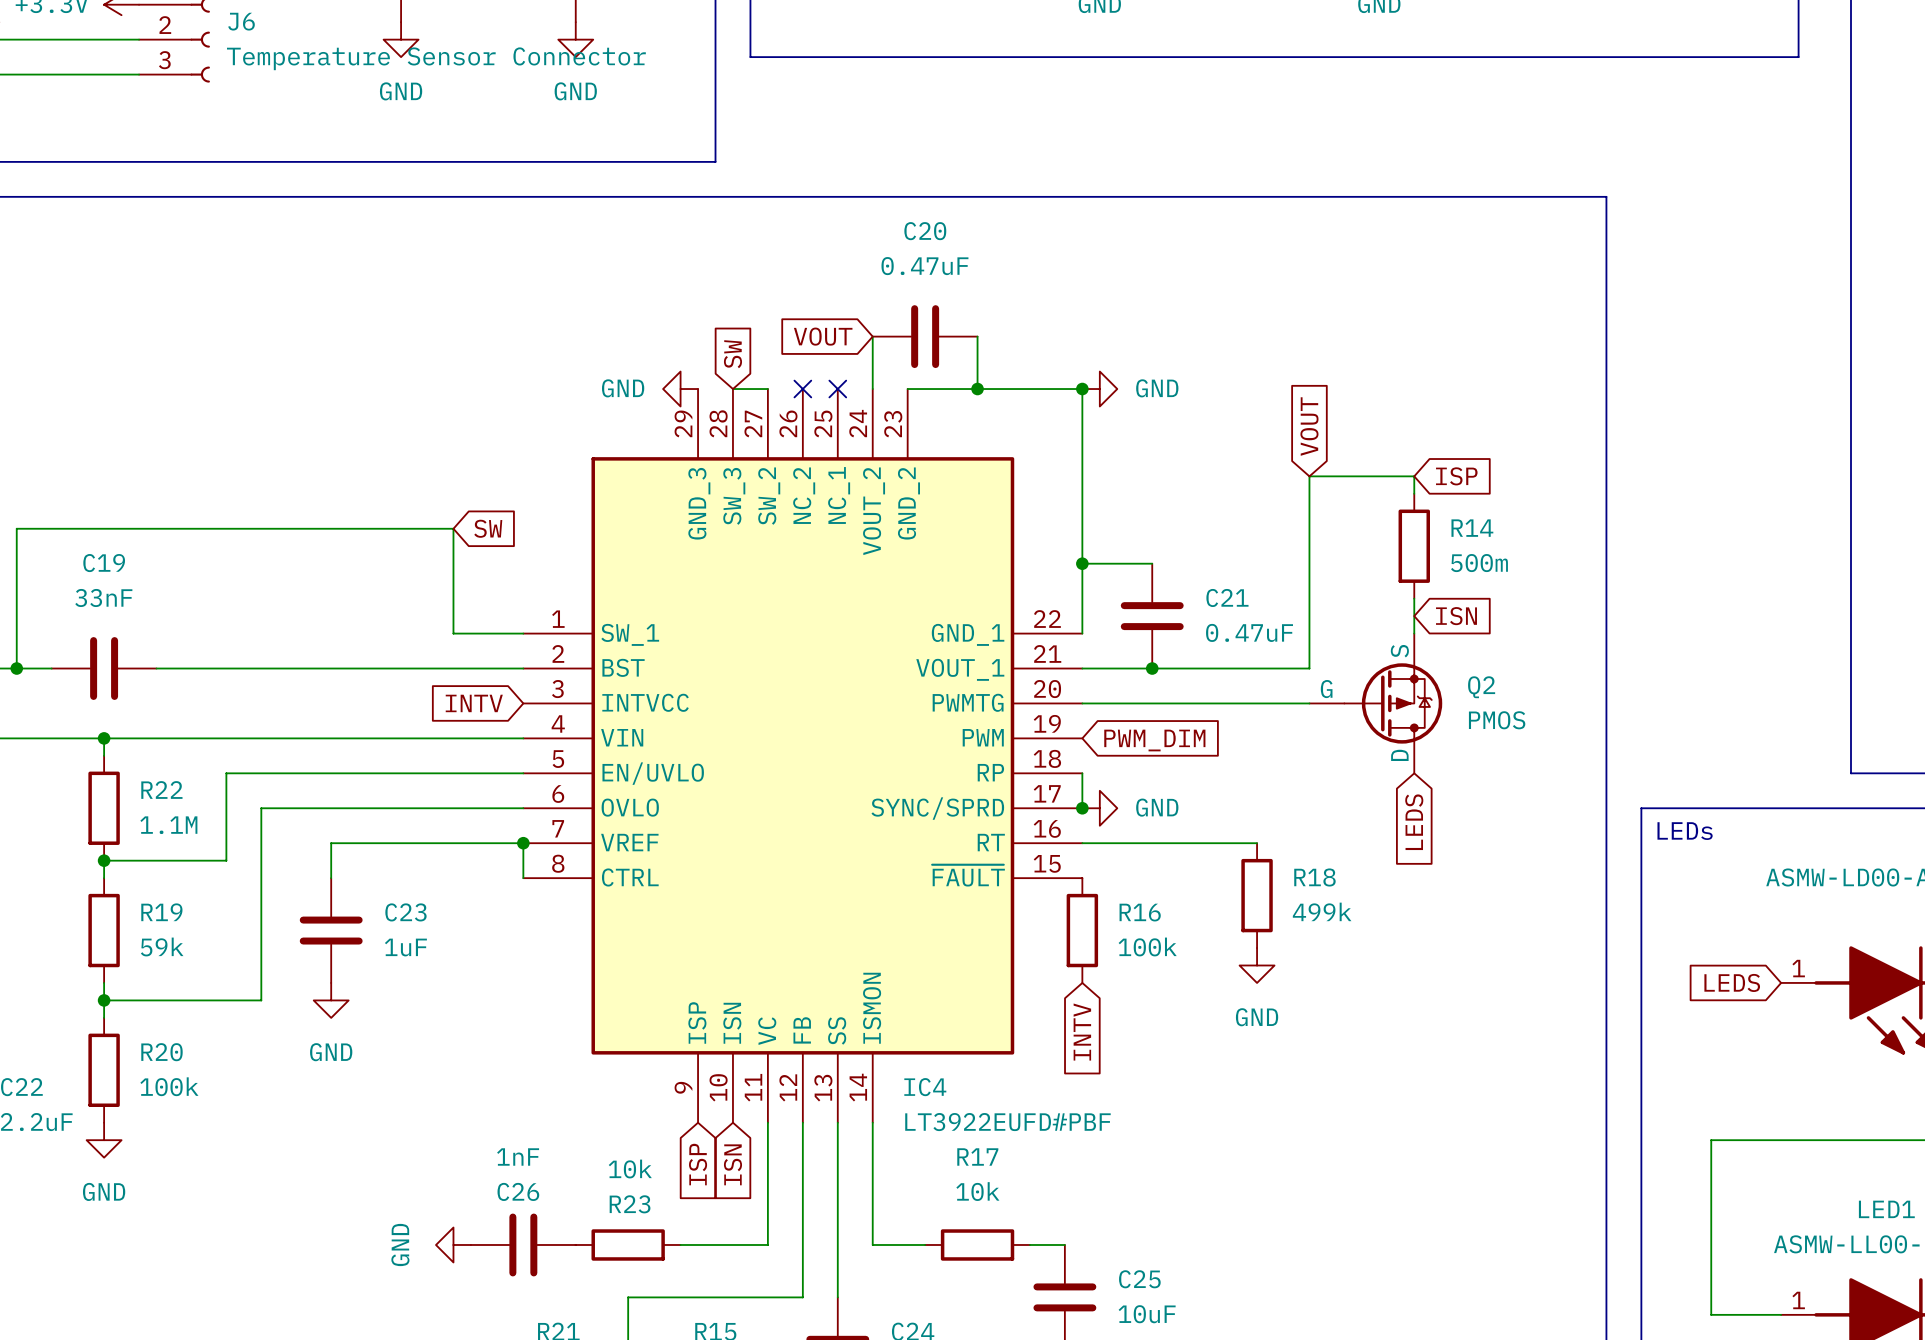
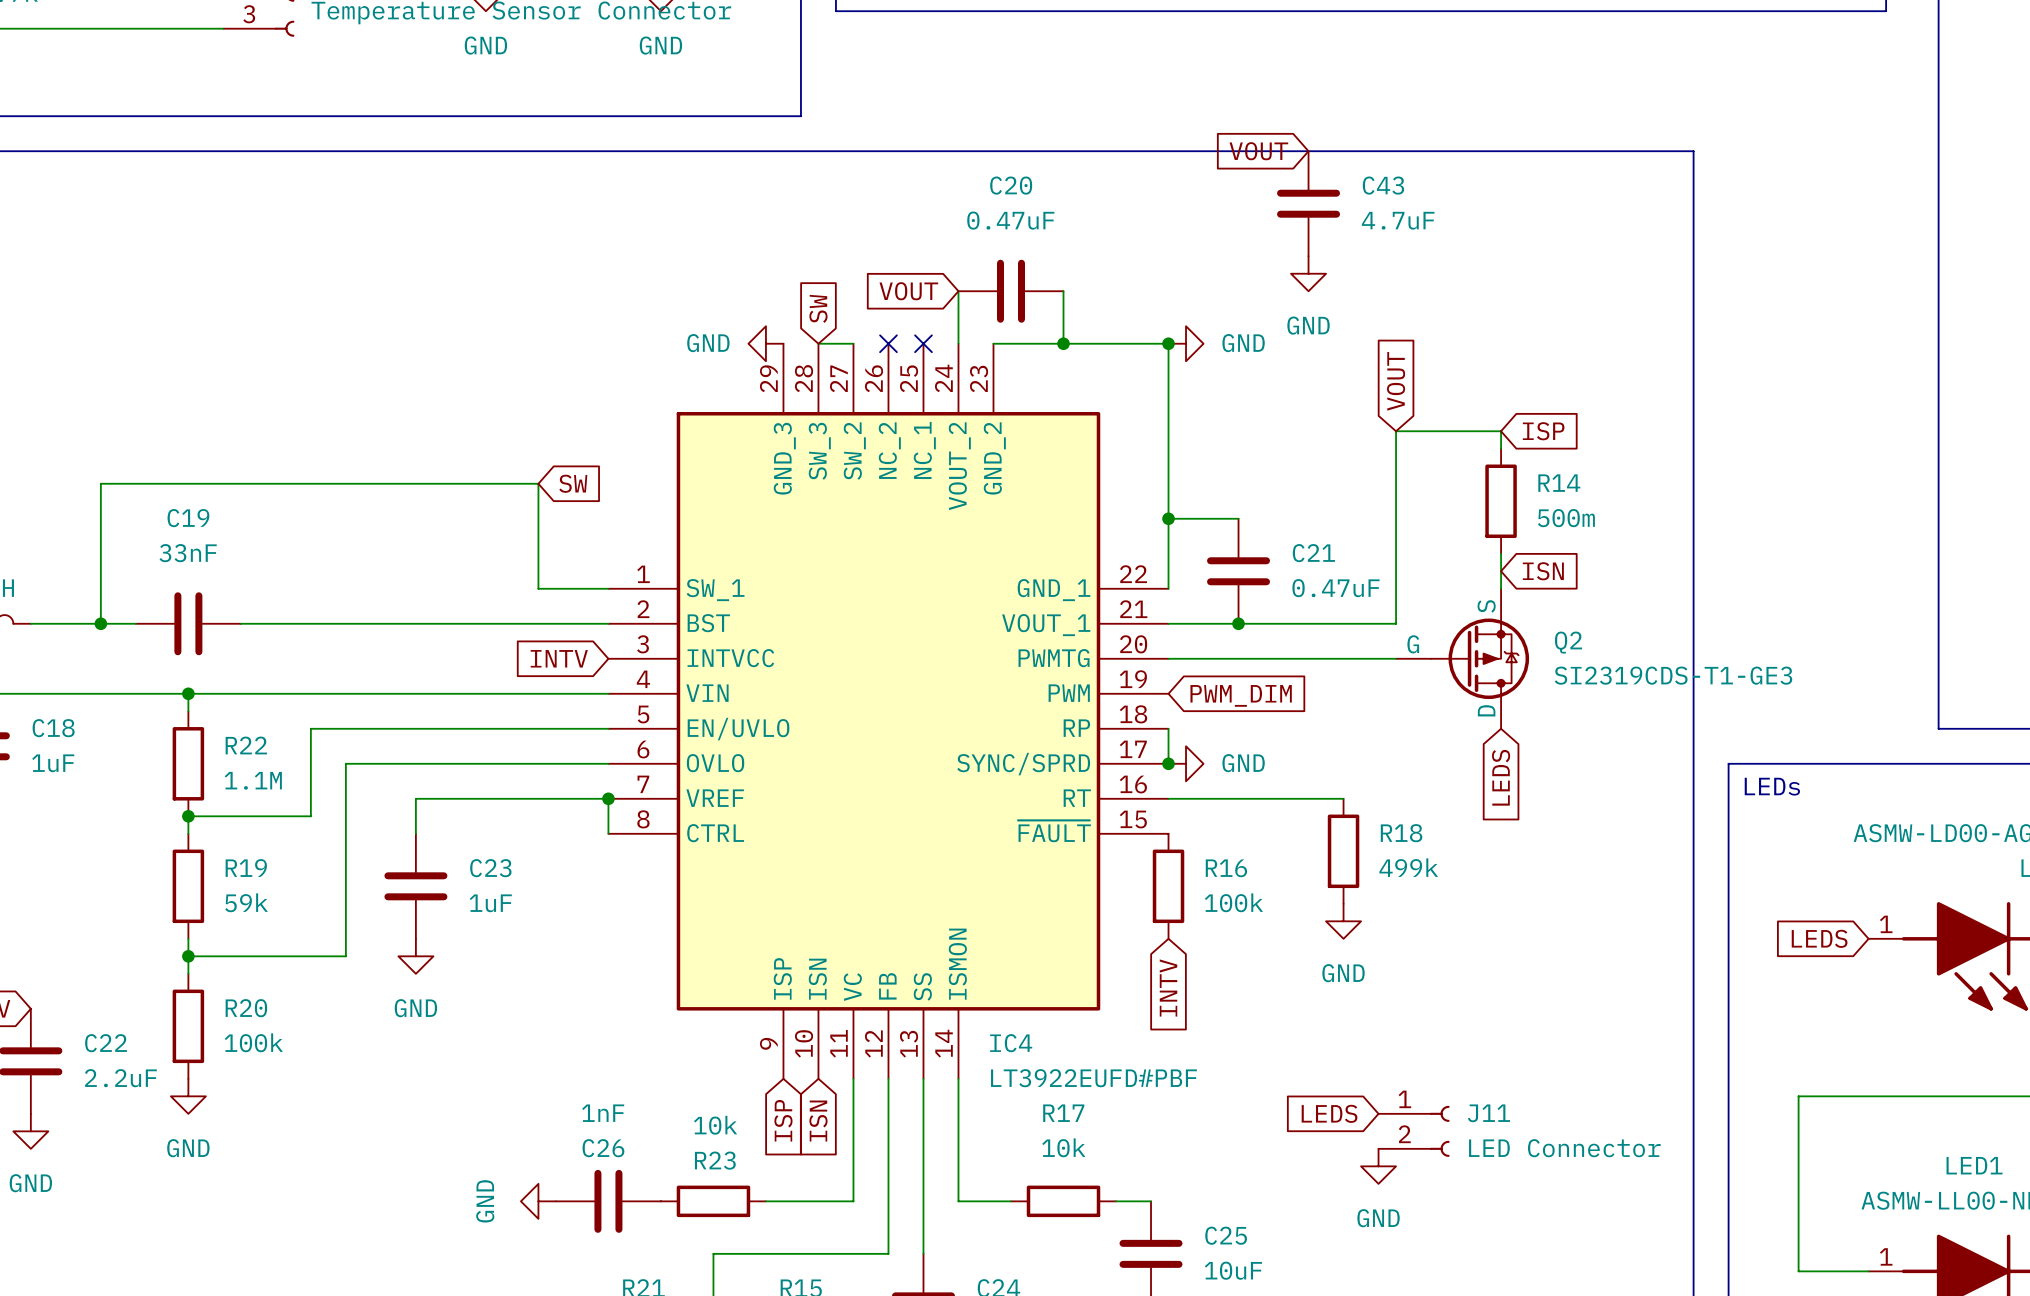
global label: none -> VOUT (1258, 151)
C43: none -> 4.7uF (1308, 203)
power symbol: none -> GND (1308, 273)
Q2 value: PMOS (1497, 720) -> SI2319CDS-T1-GE3 (1673, 675)
global label: none -> LEDS (1329, 1113)
J11: none -> LED Connector (1414, 1131)
power symbol: none -> GND (1378, 1166)

